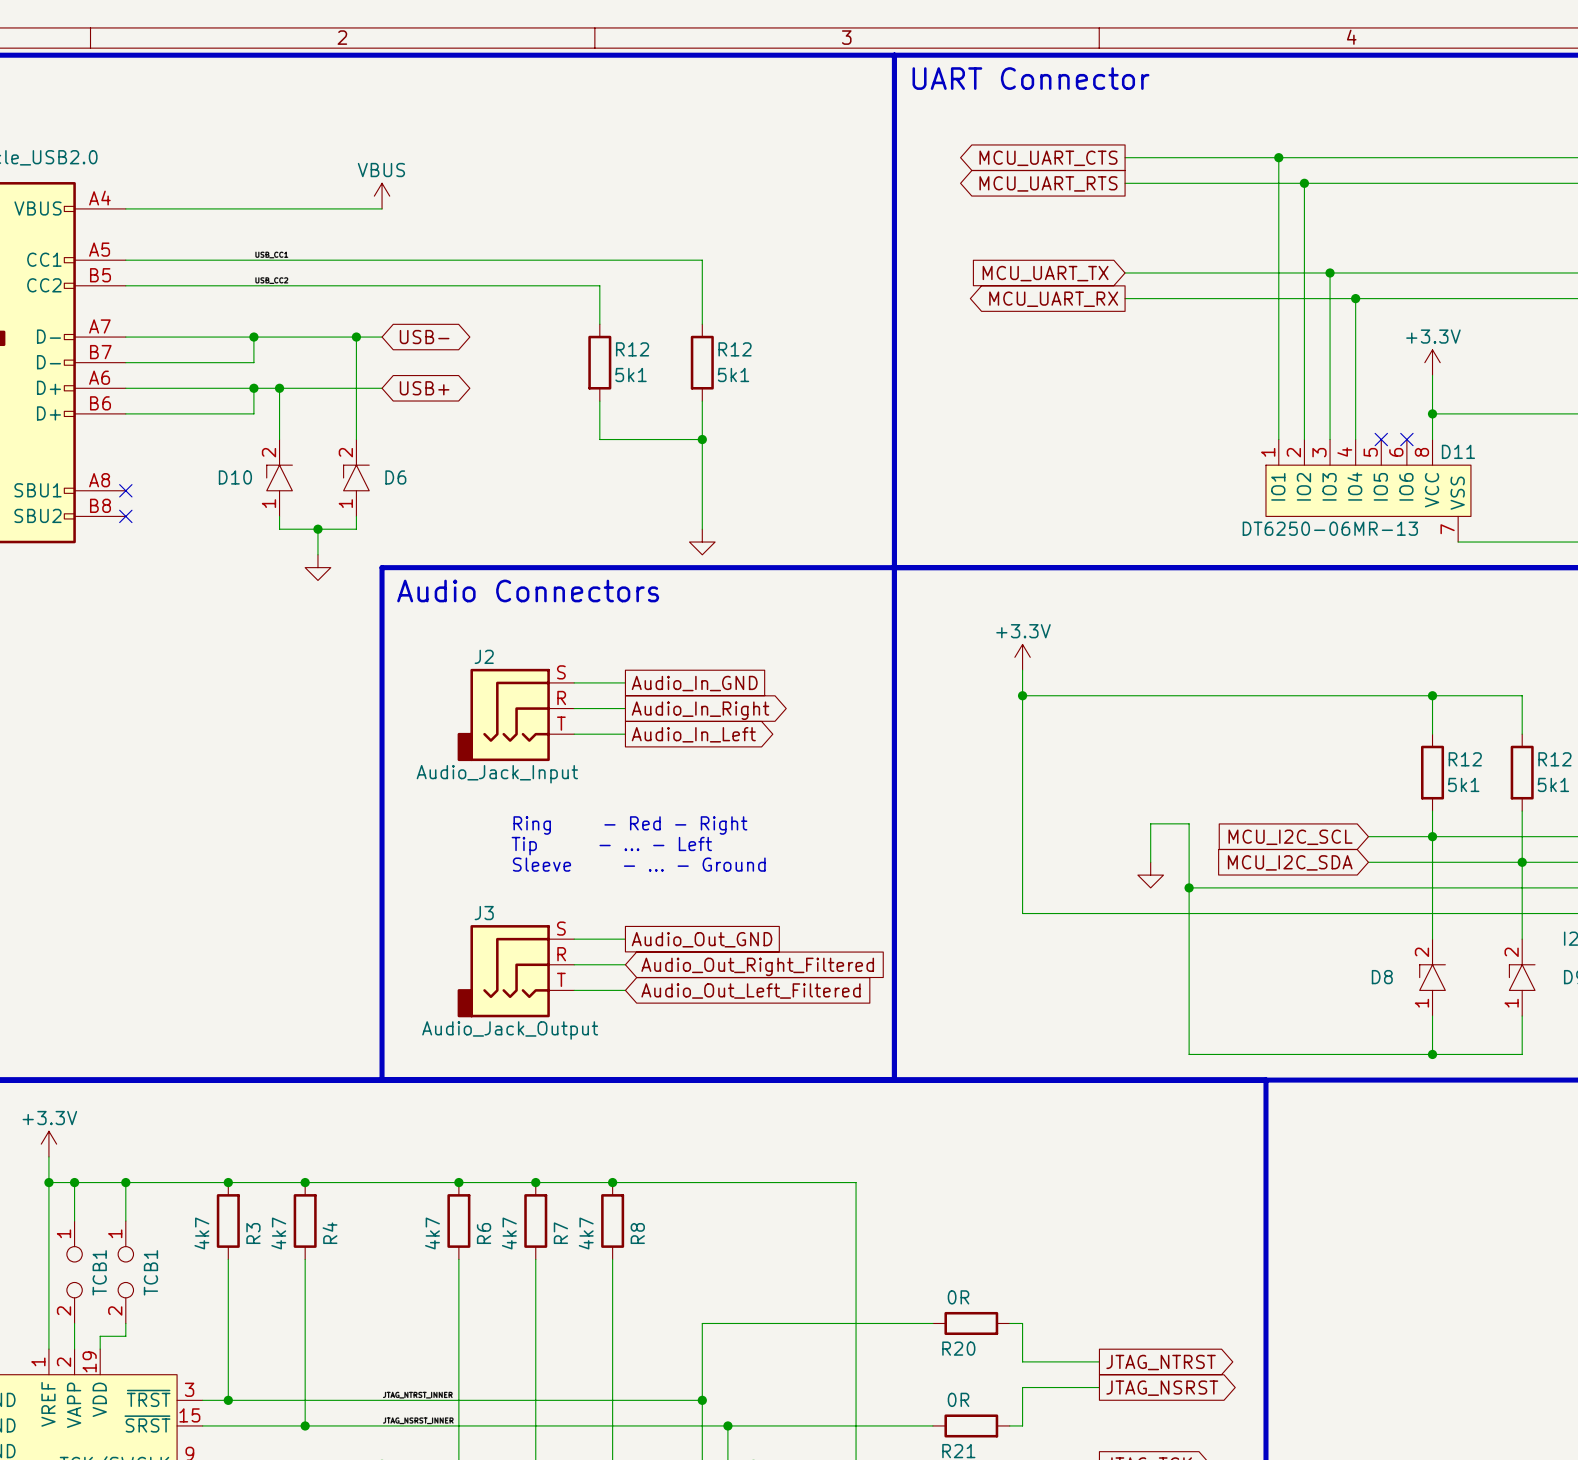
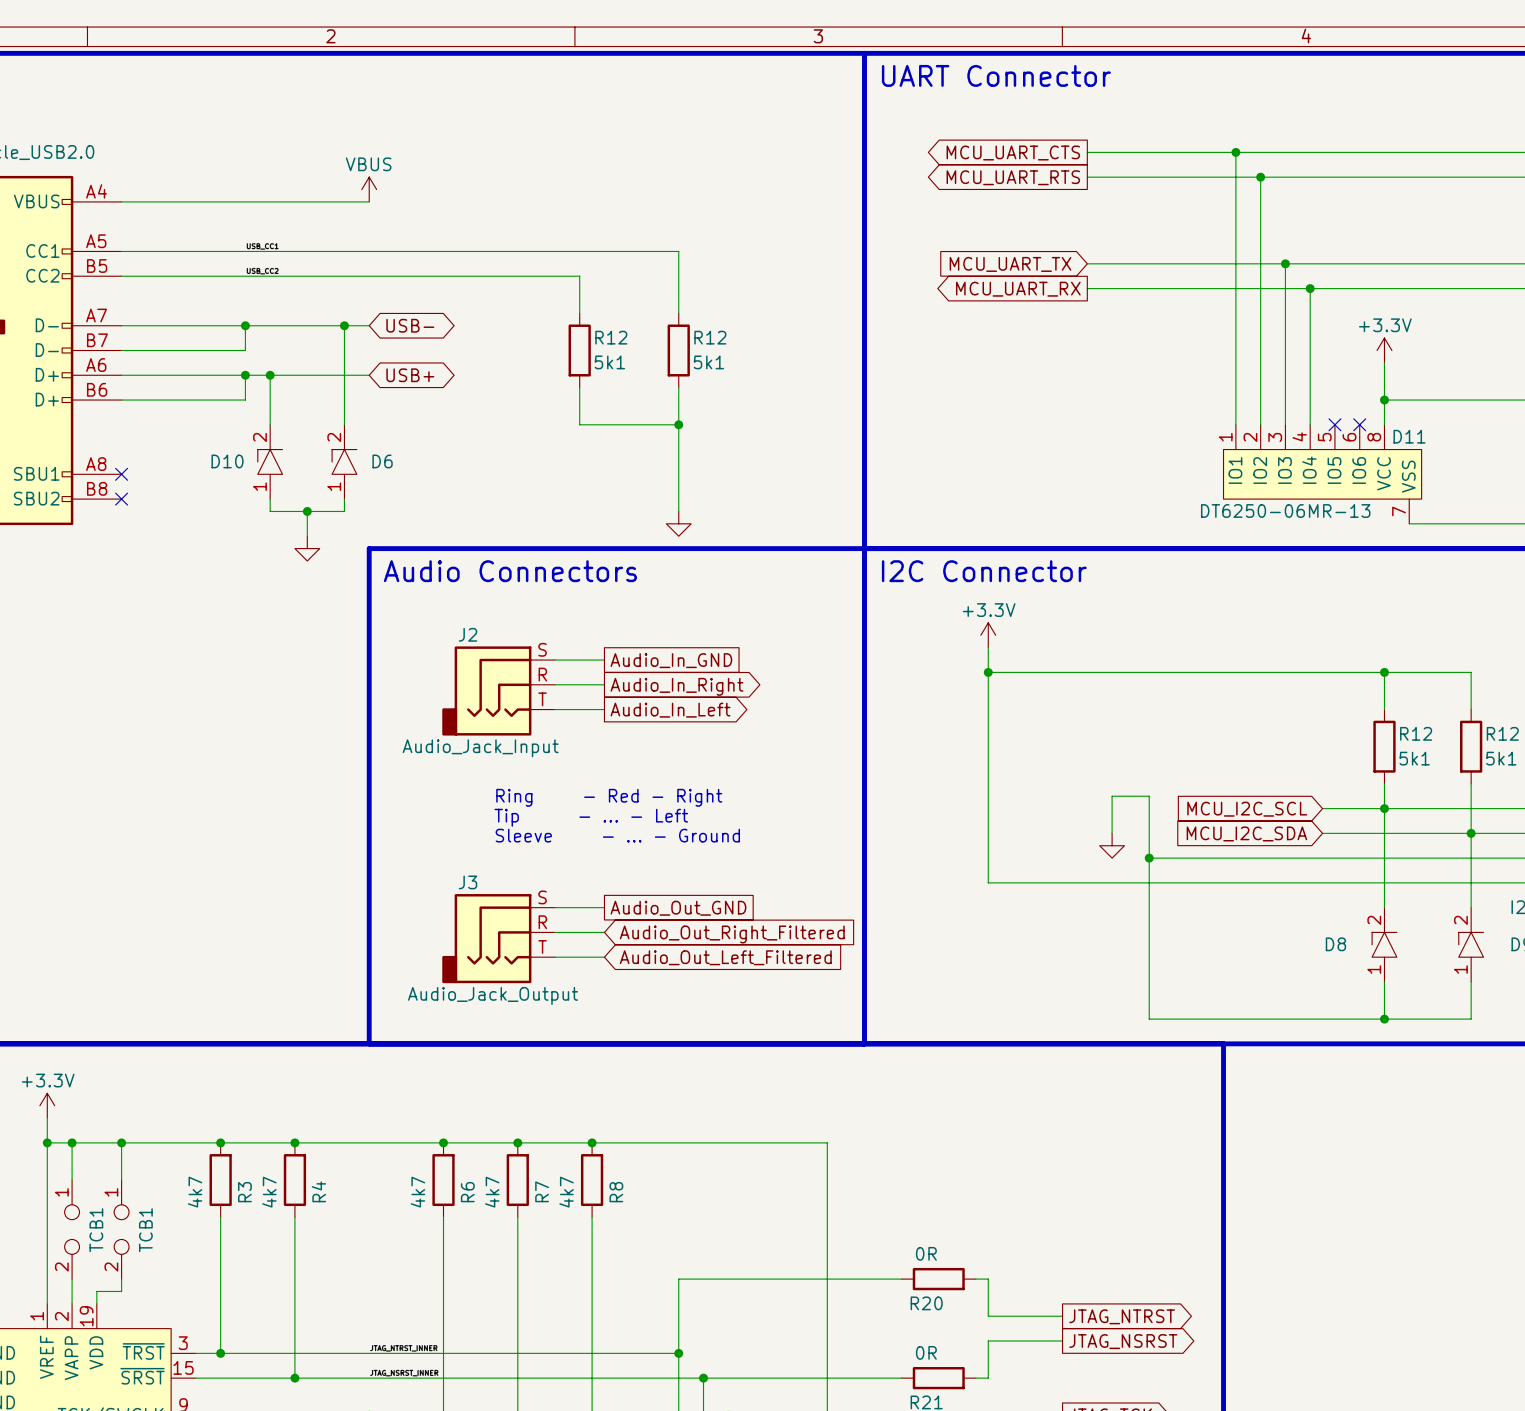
text: none -> I2C Connector (984, 571)

